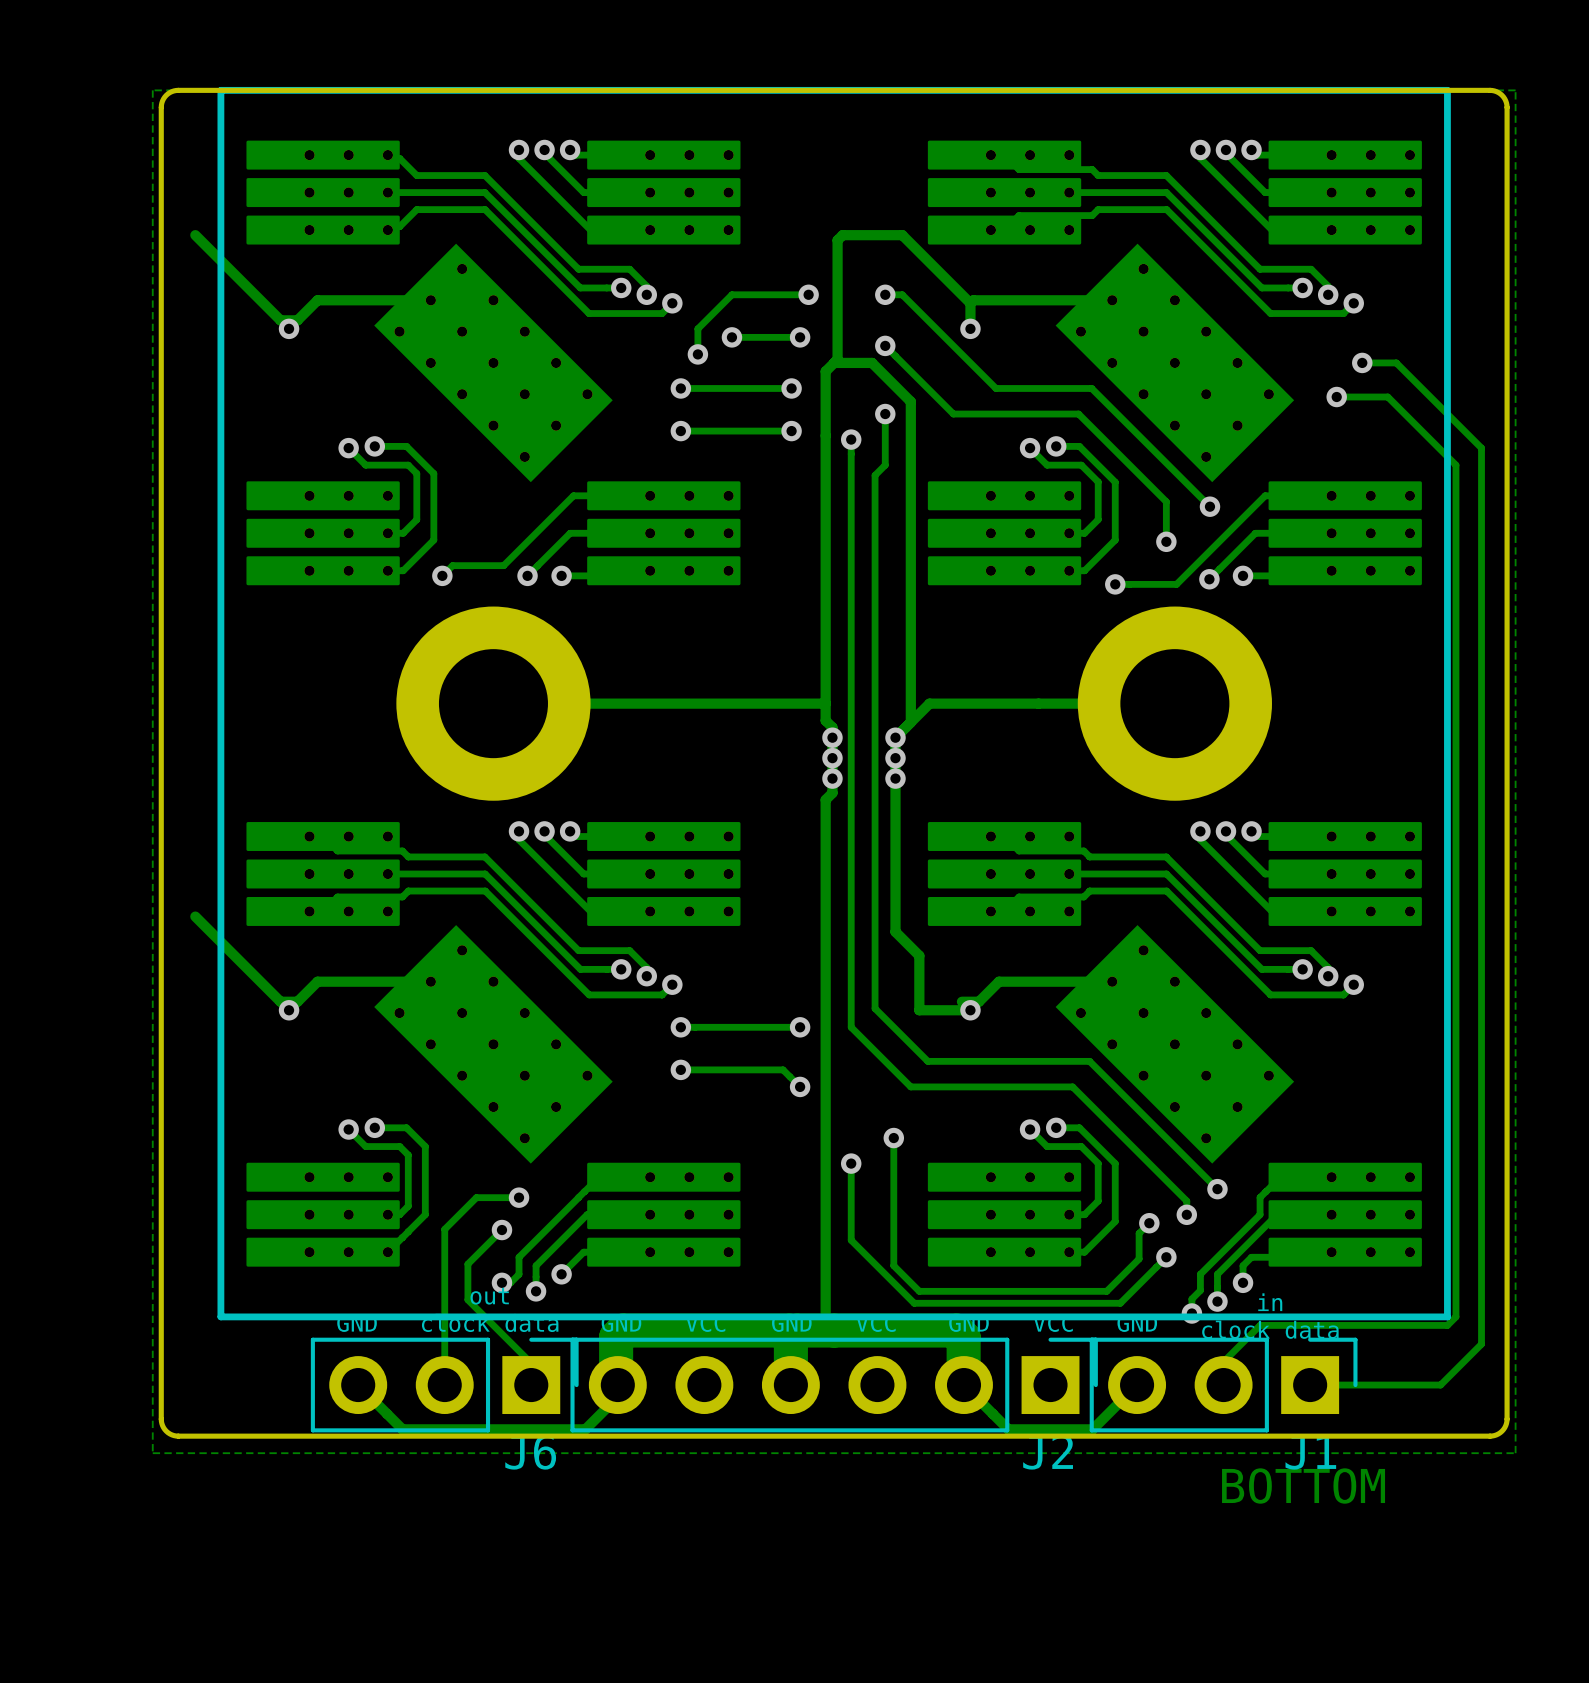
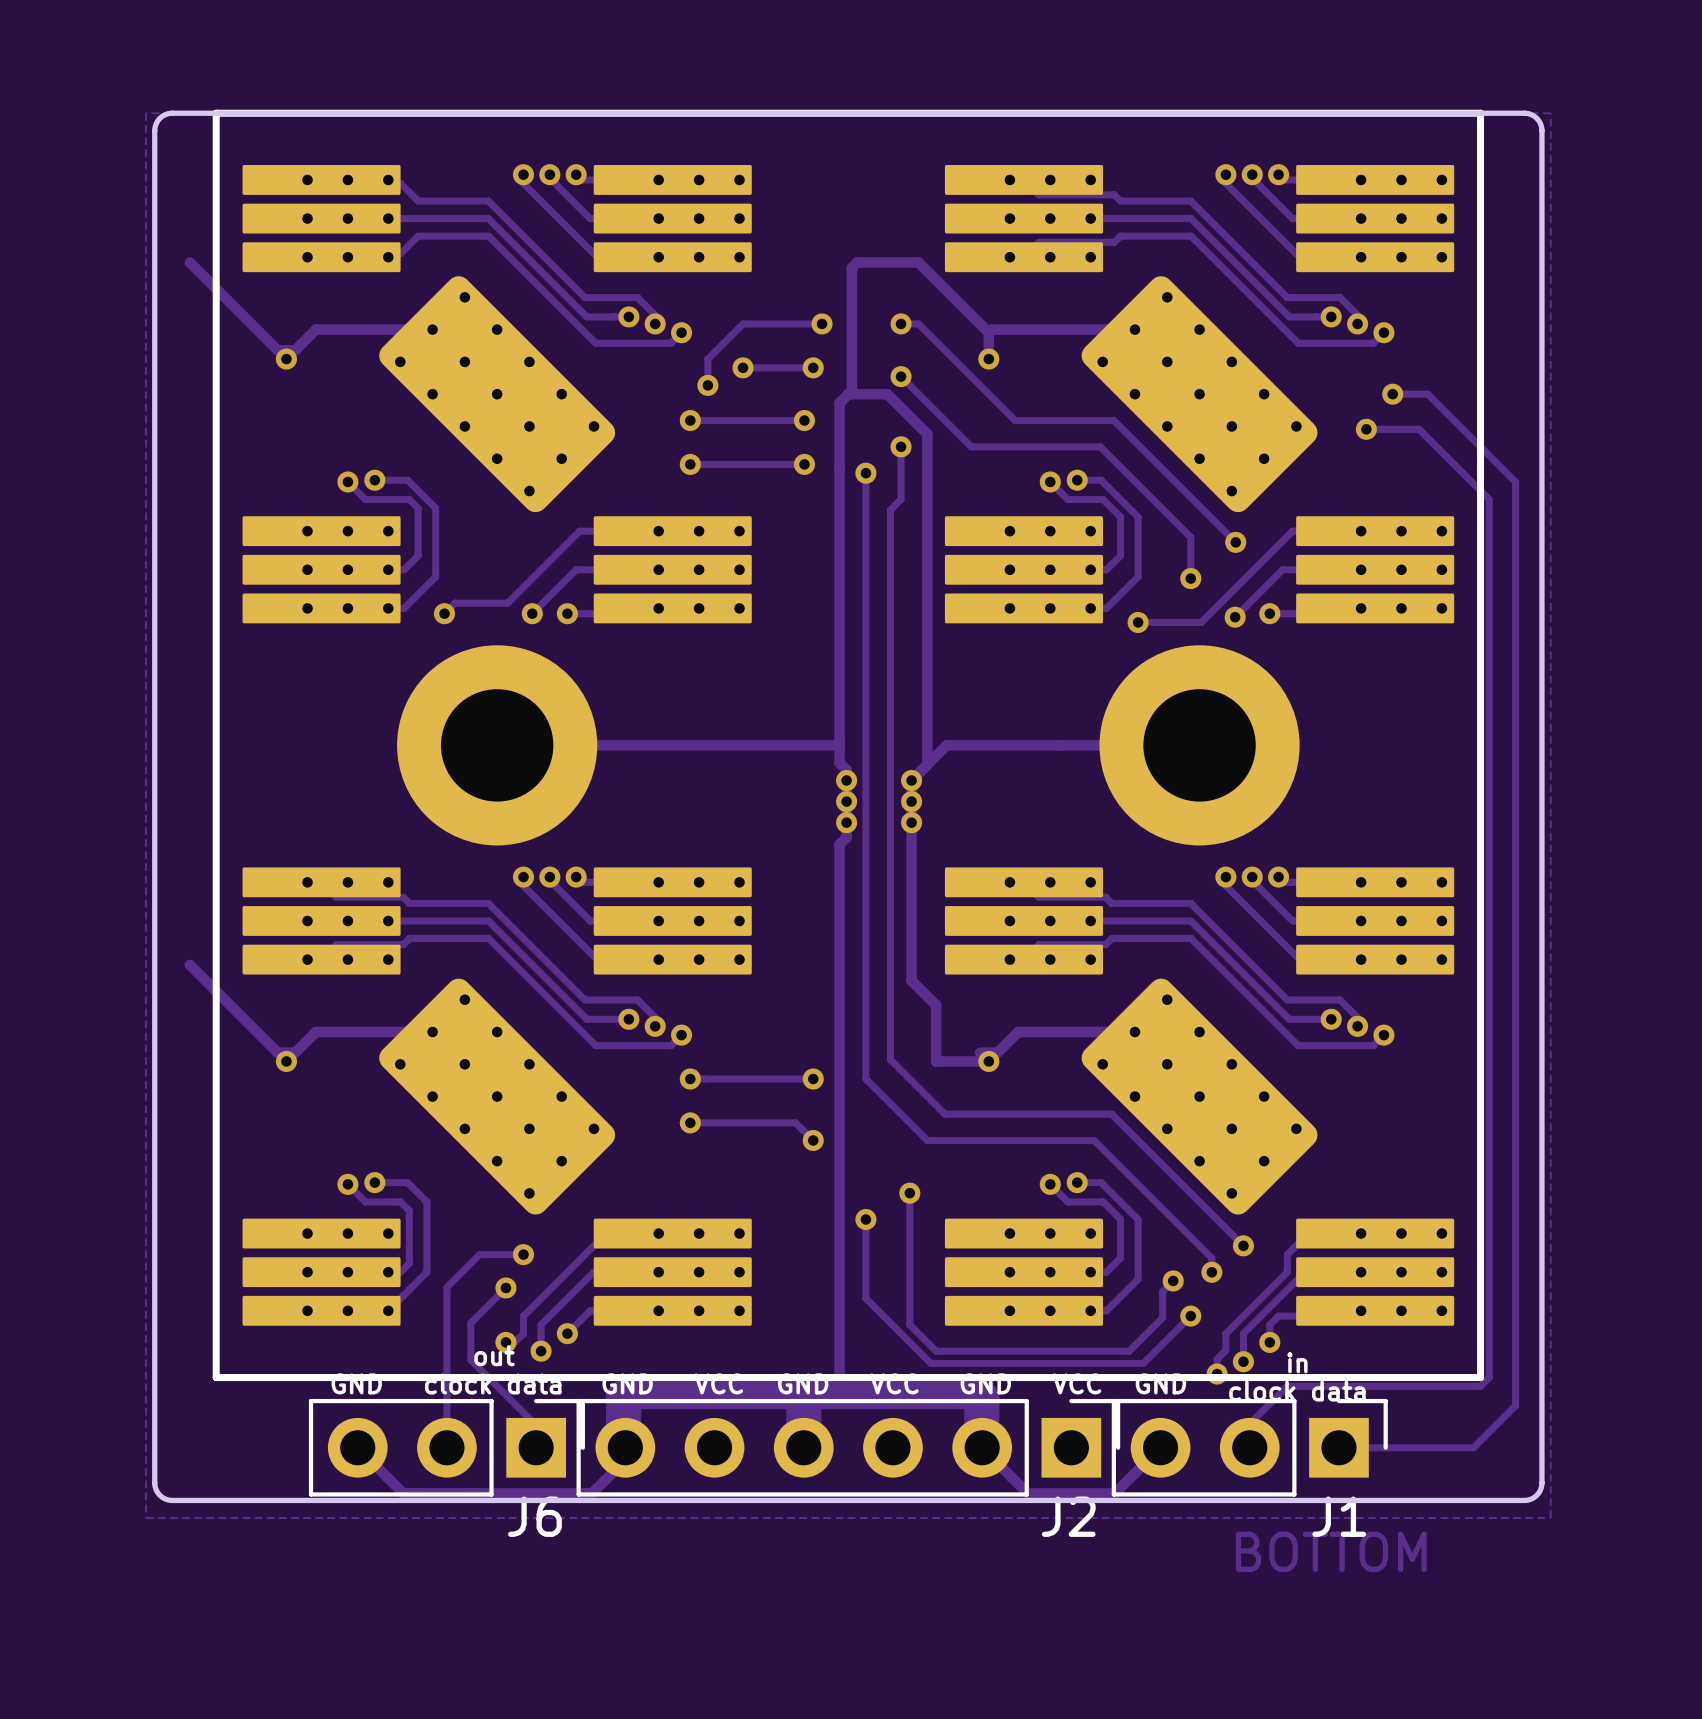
part footprint: [374, 243, 613, 483] -> [379, 276, 616, 513]
part footprint: [1055, 243, 1295, 483] -> [1081, 276, 1318, 513]
part footprint: [374, 925, 613, 1164] -> [379, 978, 616, 1215]
part footprint: [1055, 925, 1295, 1164] -> [1081, 978, 1318, 1215]

